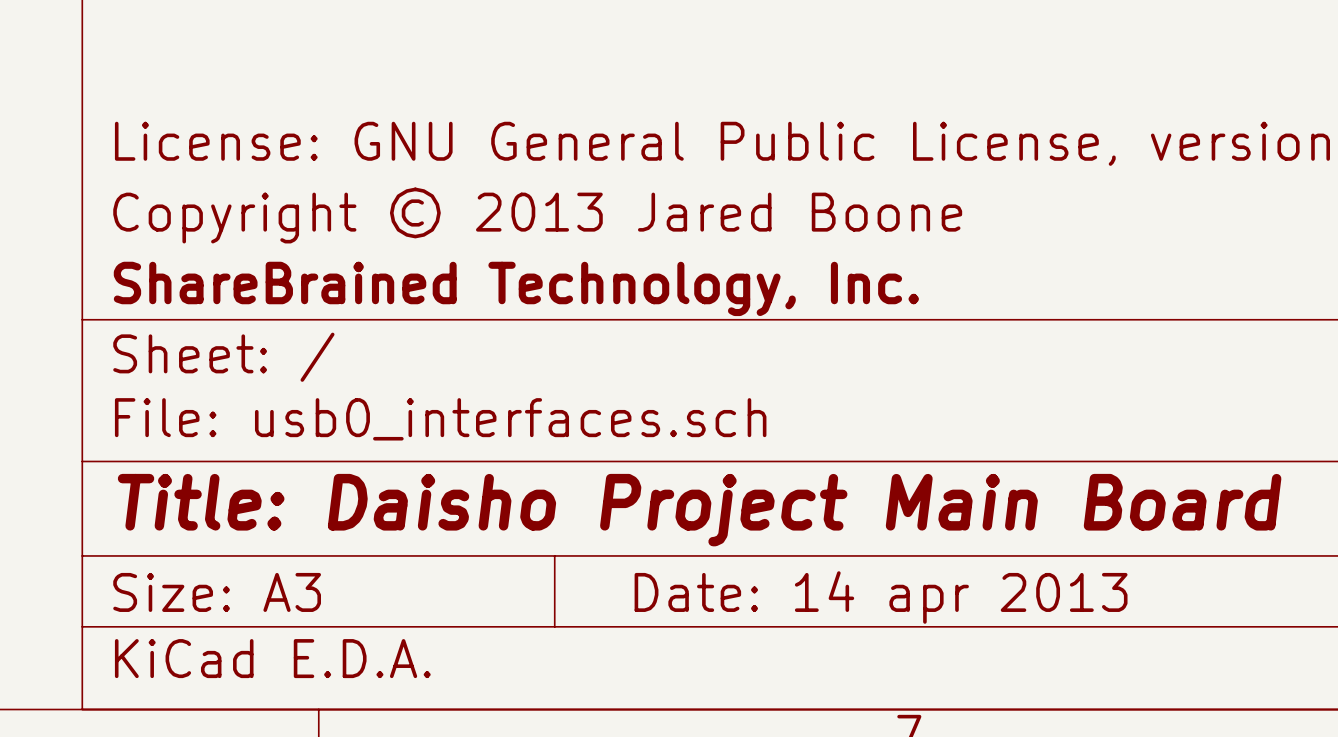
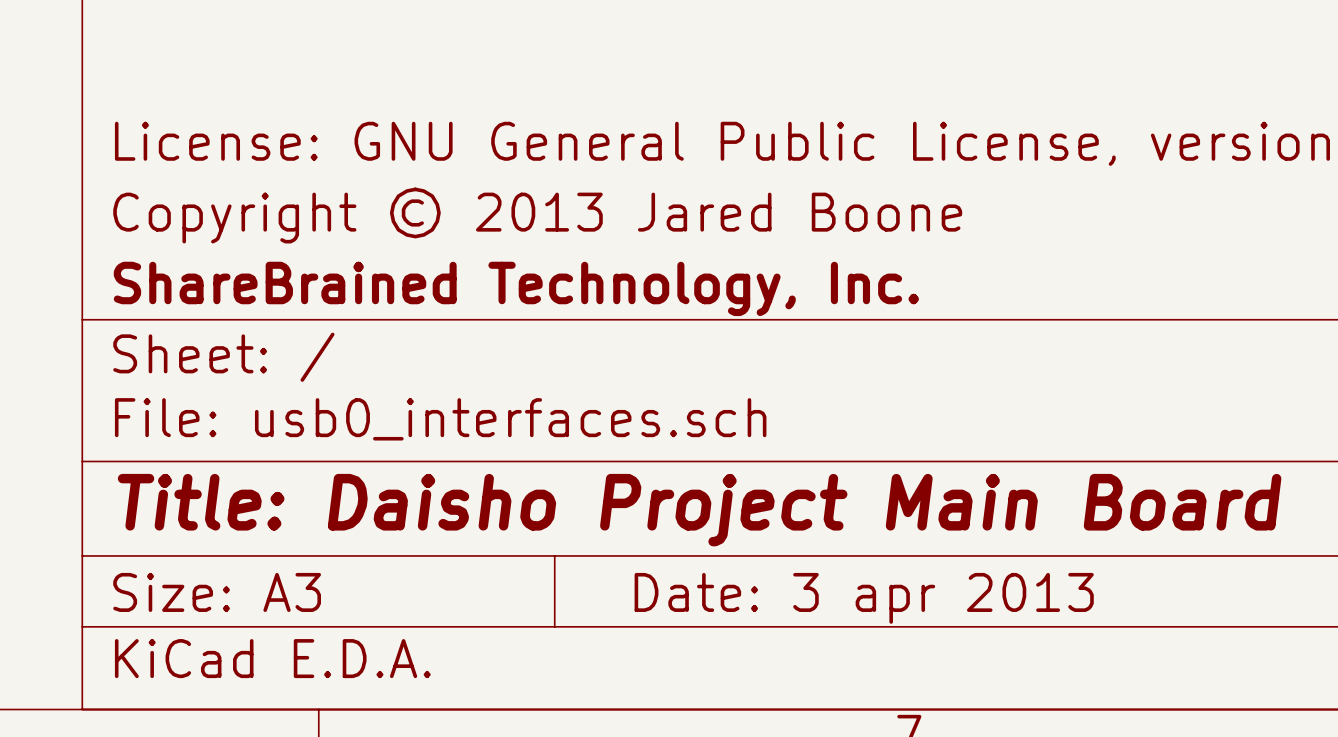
title block: Date: 14 apr 2013 (881, 597) -> Date: 3 apr 2013 (864, 598)

